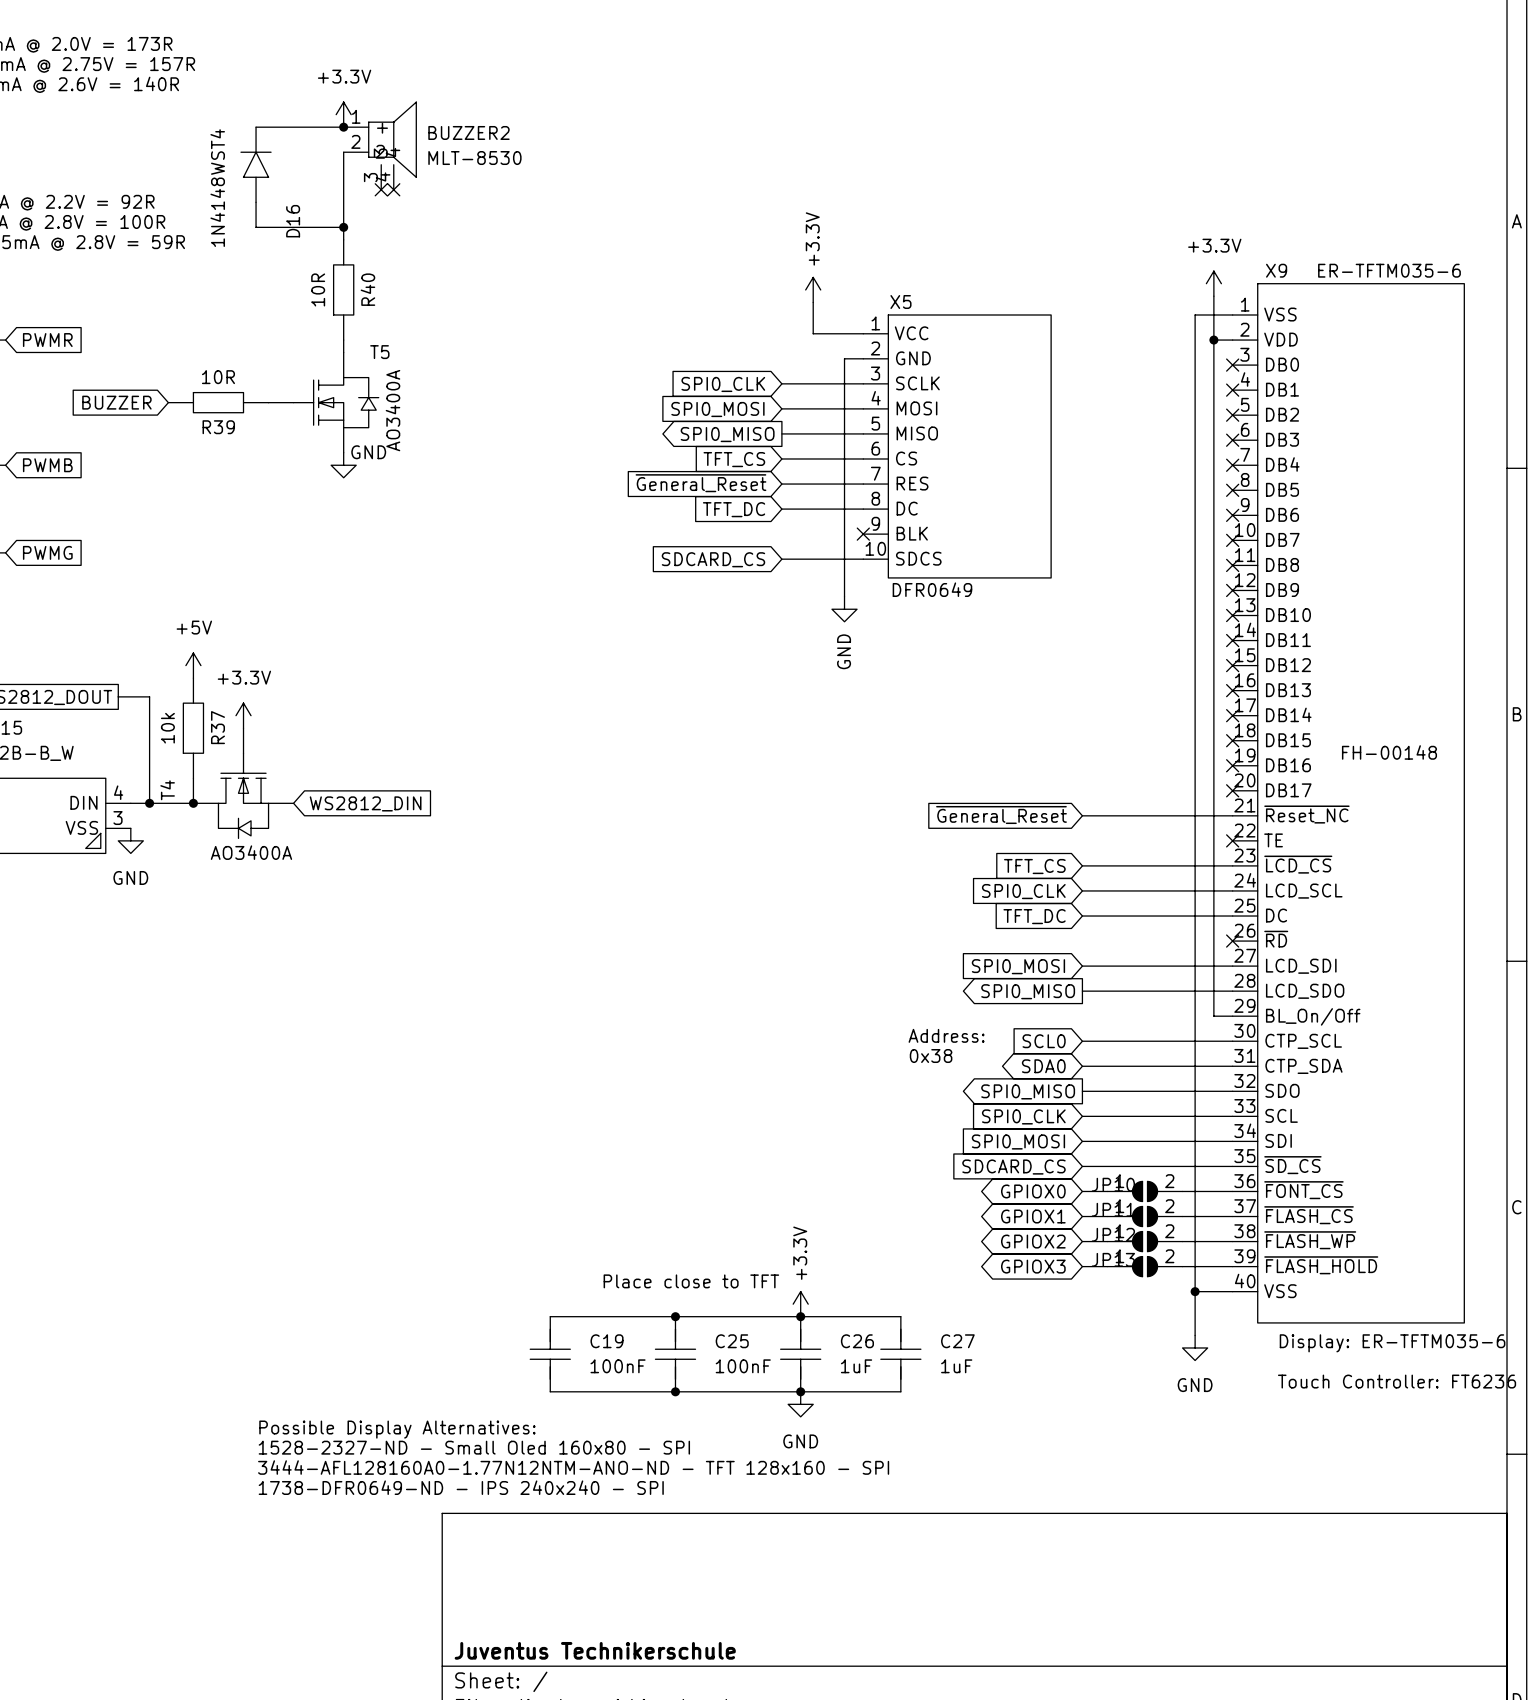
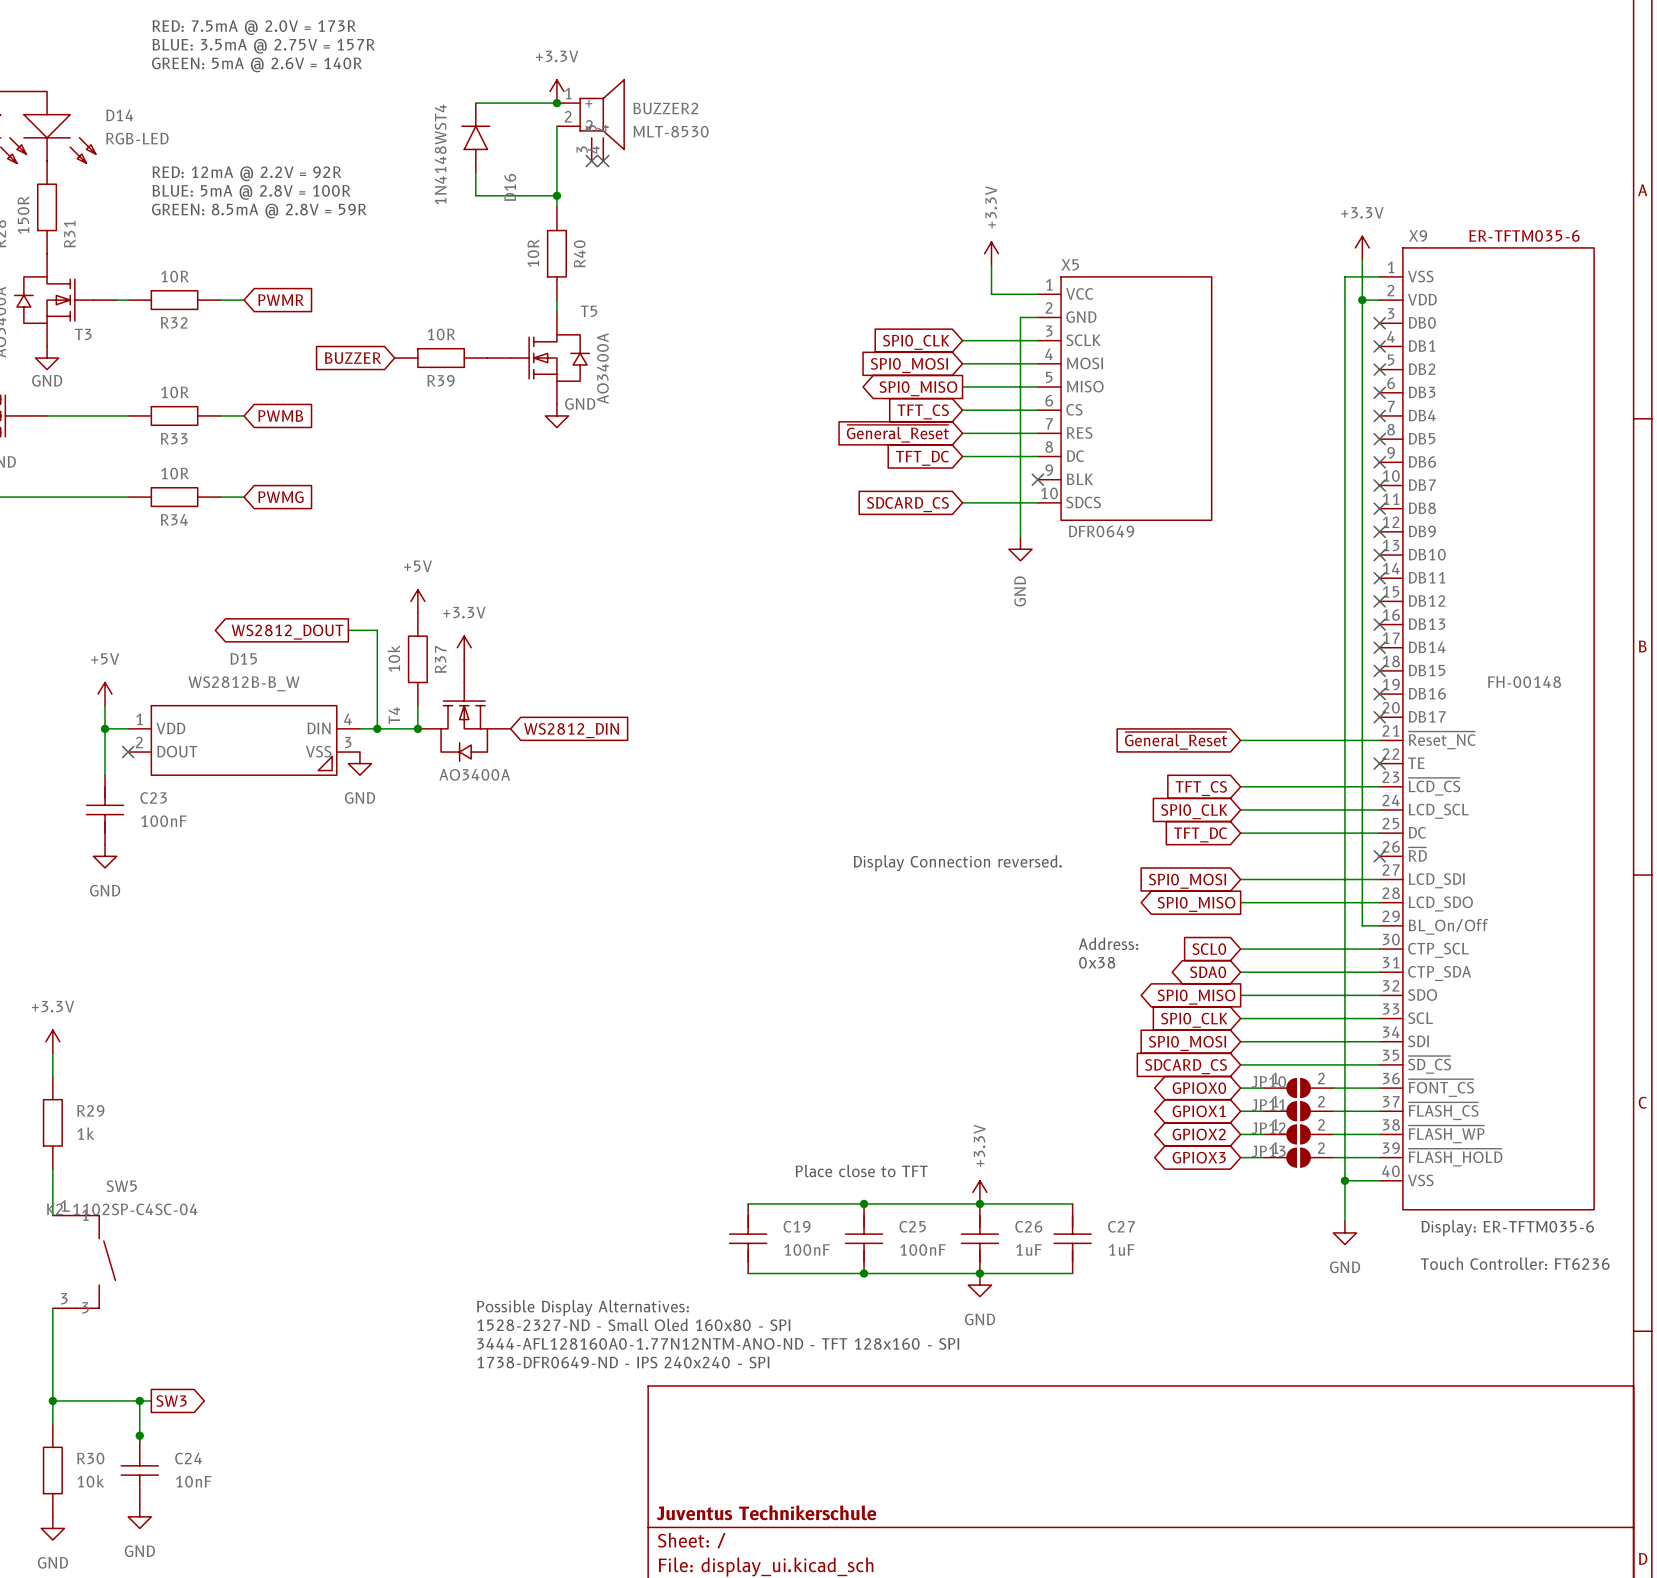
text: none -> Display Connection reversed. (957, 863)

